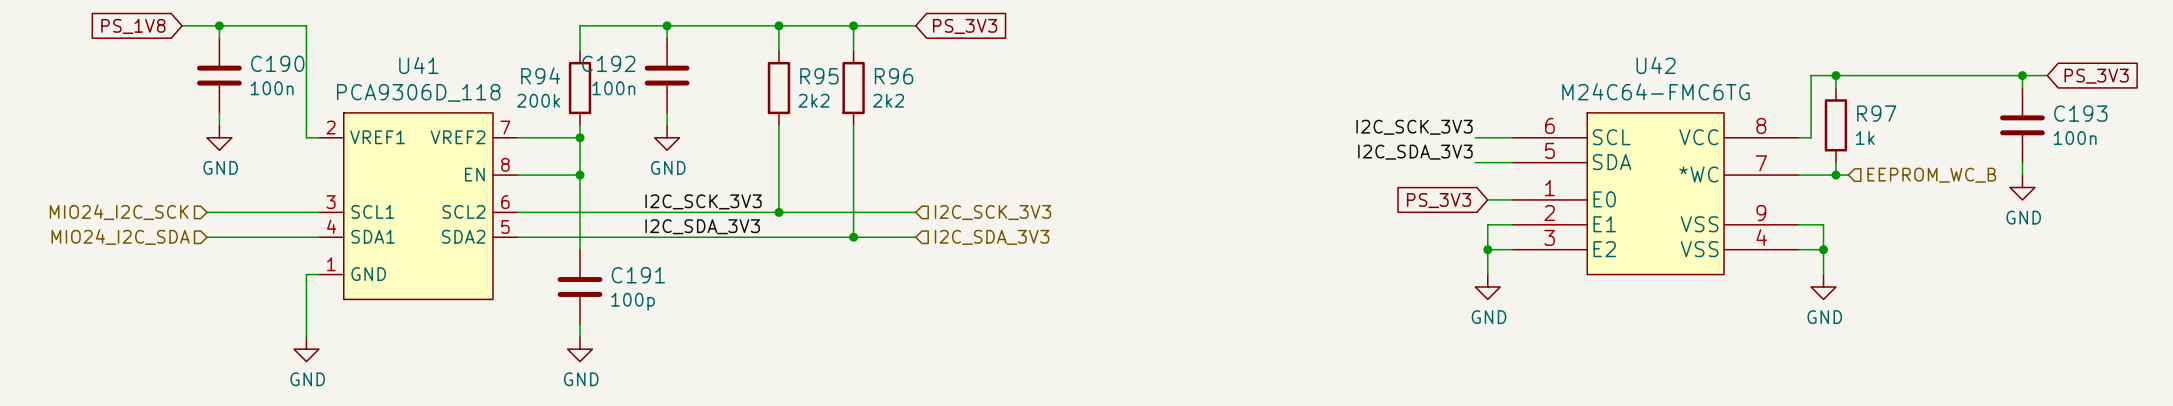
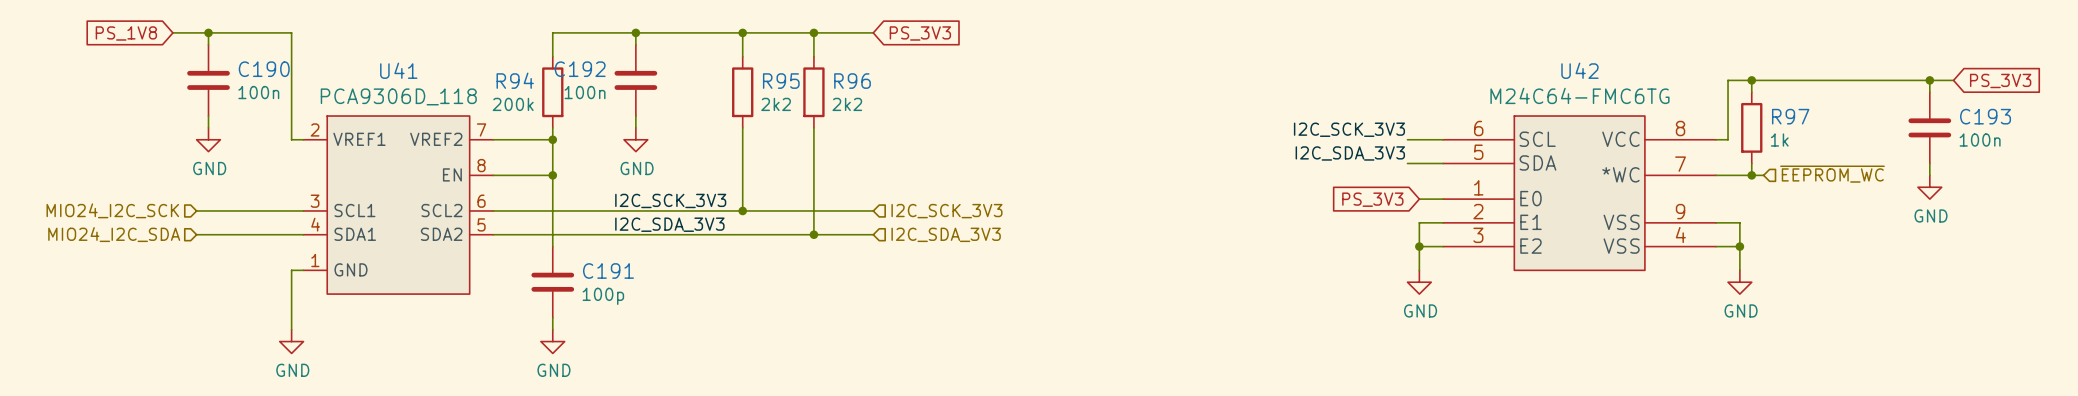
hierarchical label: EEPROM_WC_B (1931, 175) -> ~{EEPROM_WC} (1832, 174)

